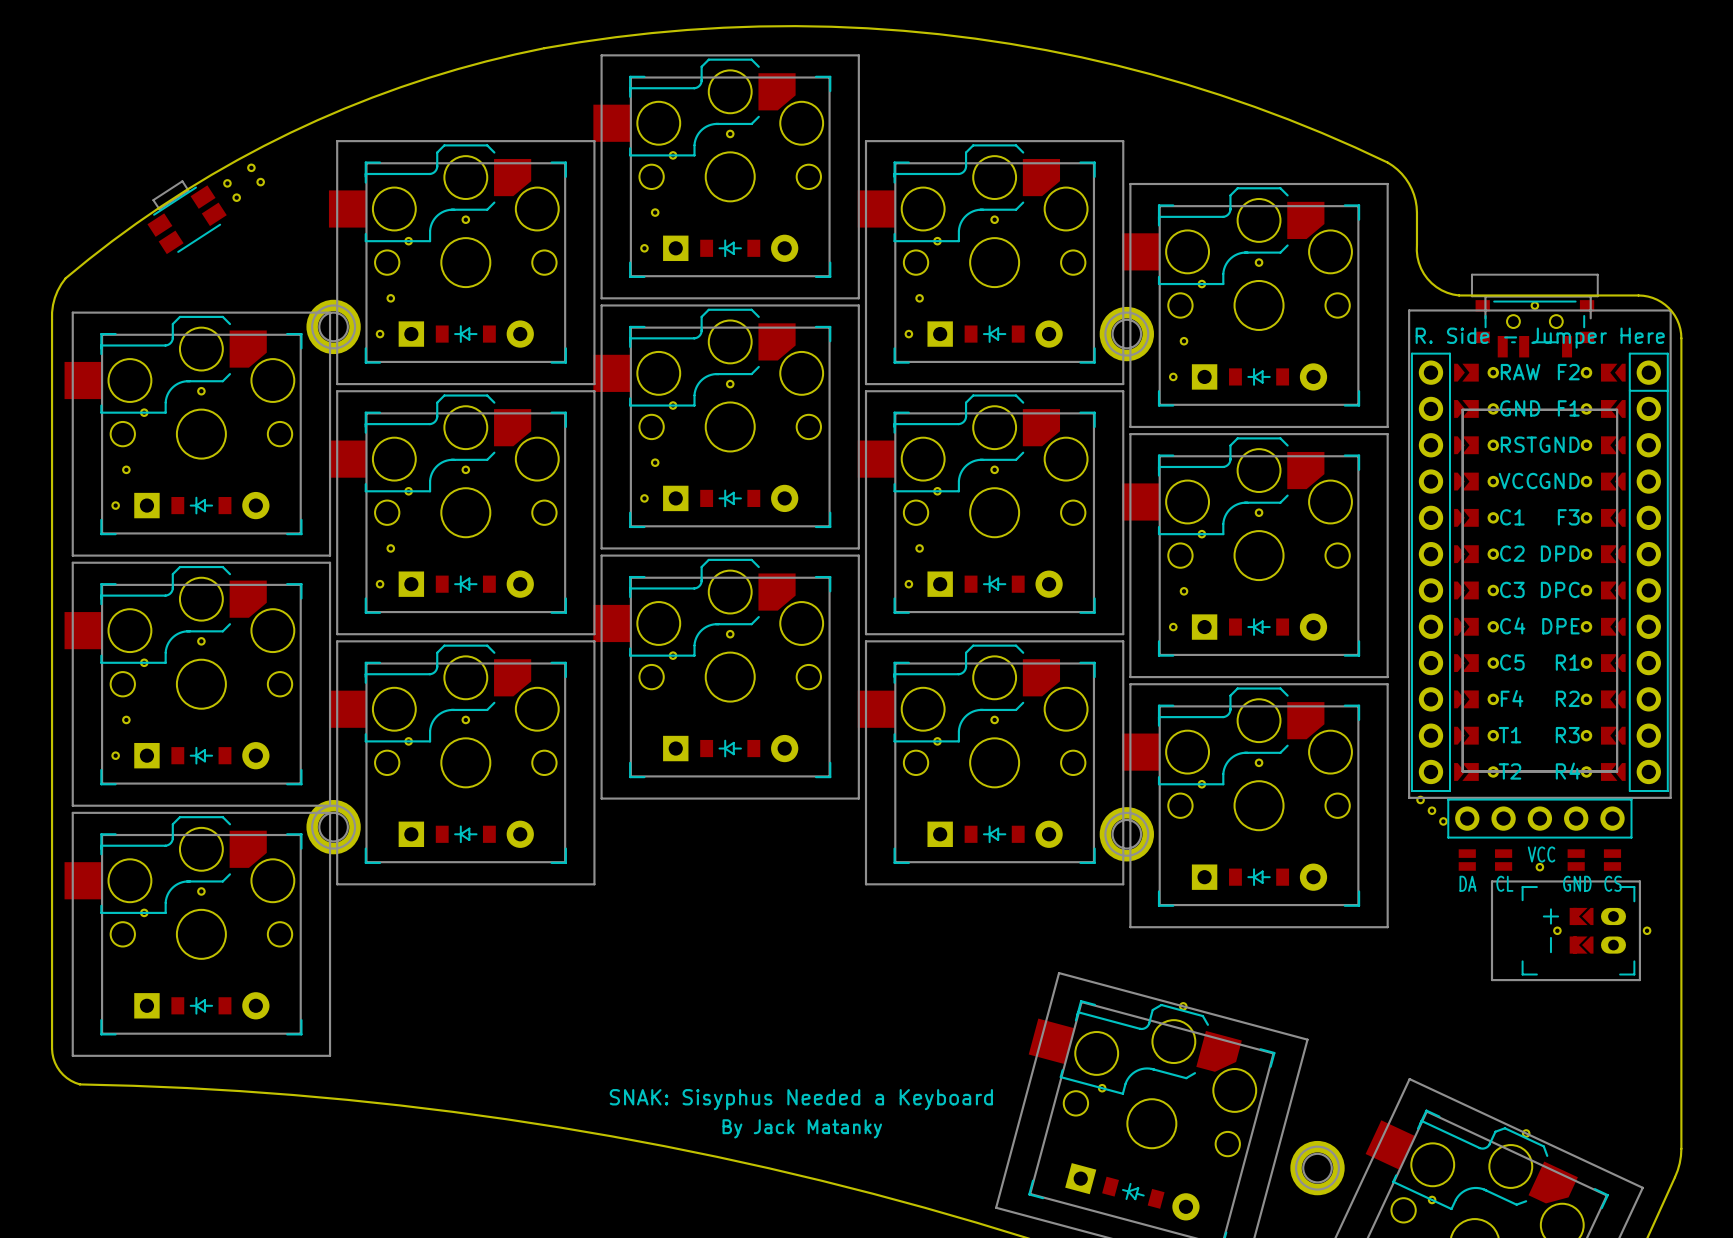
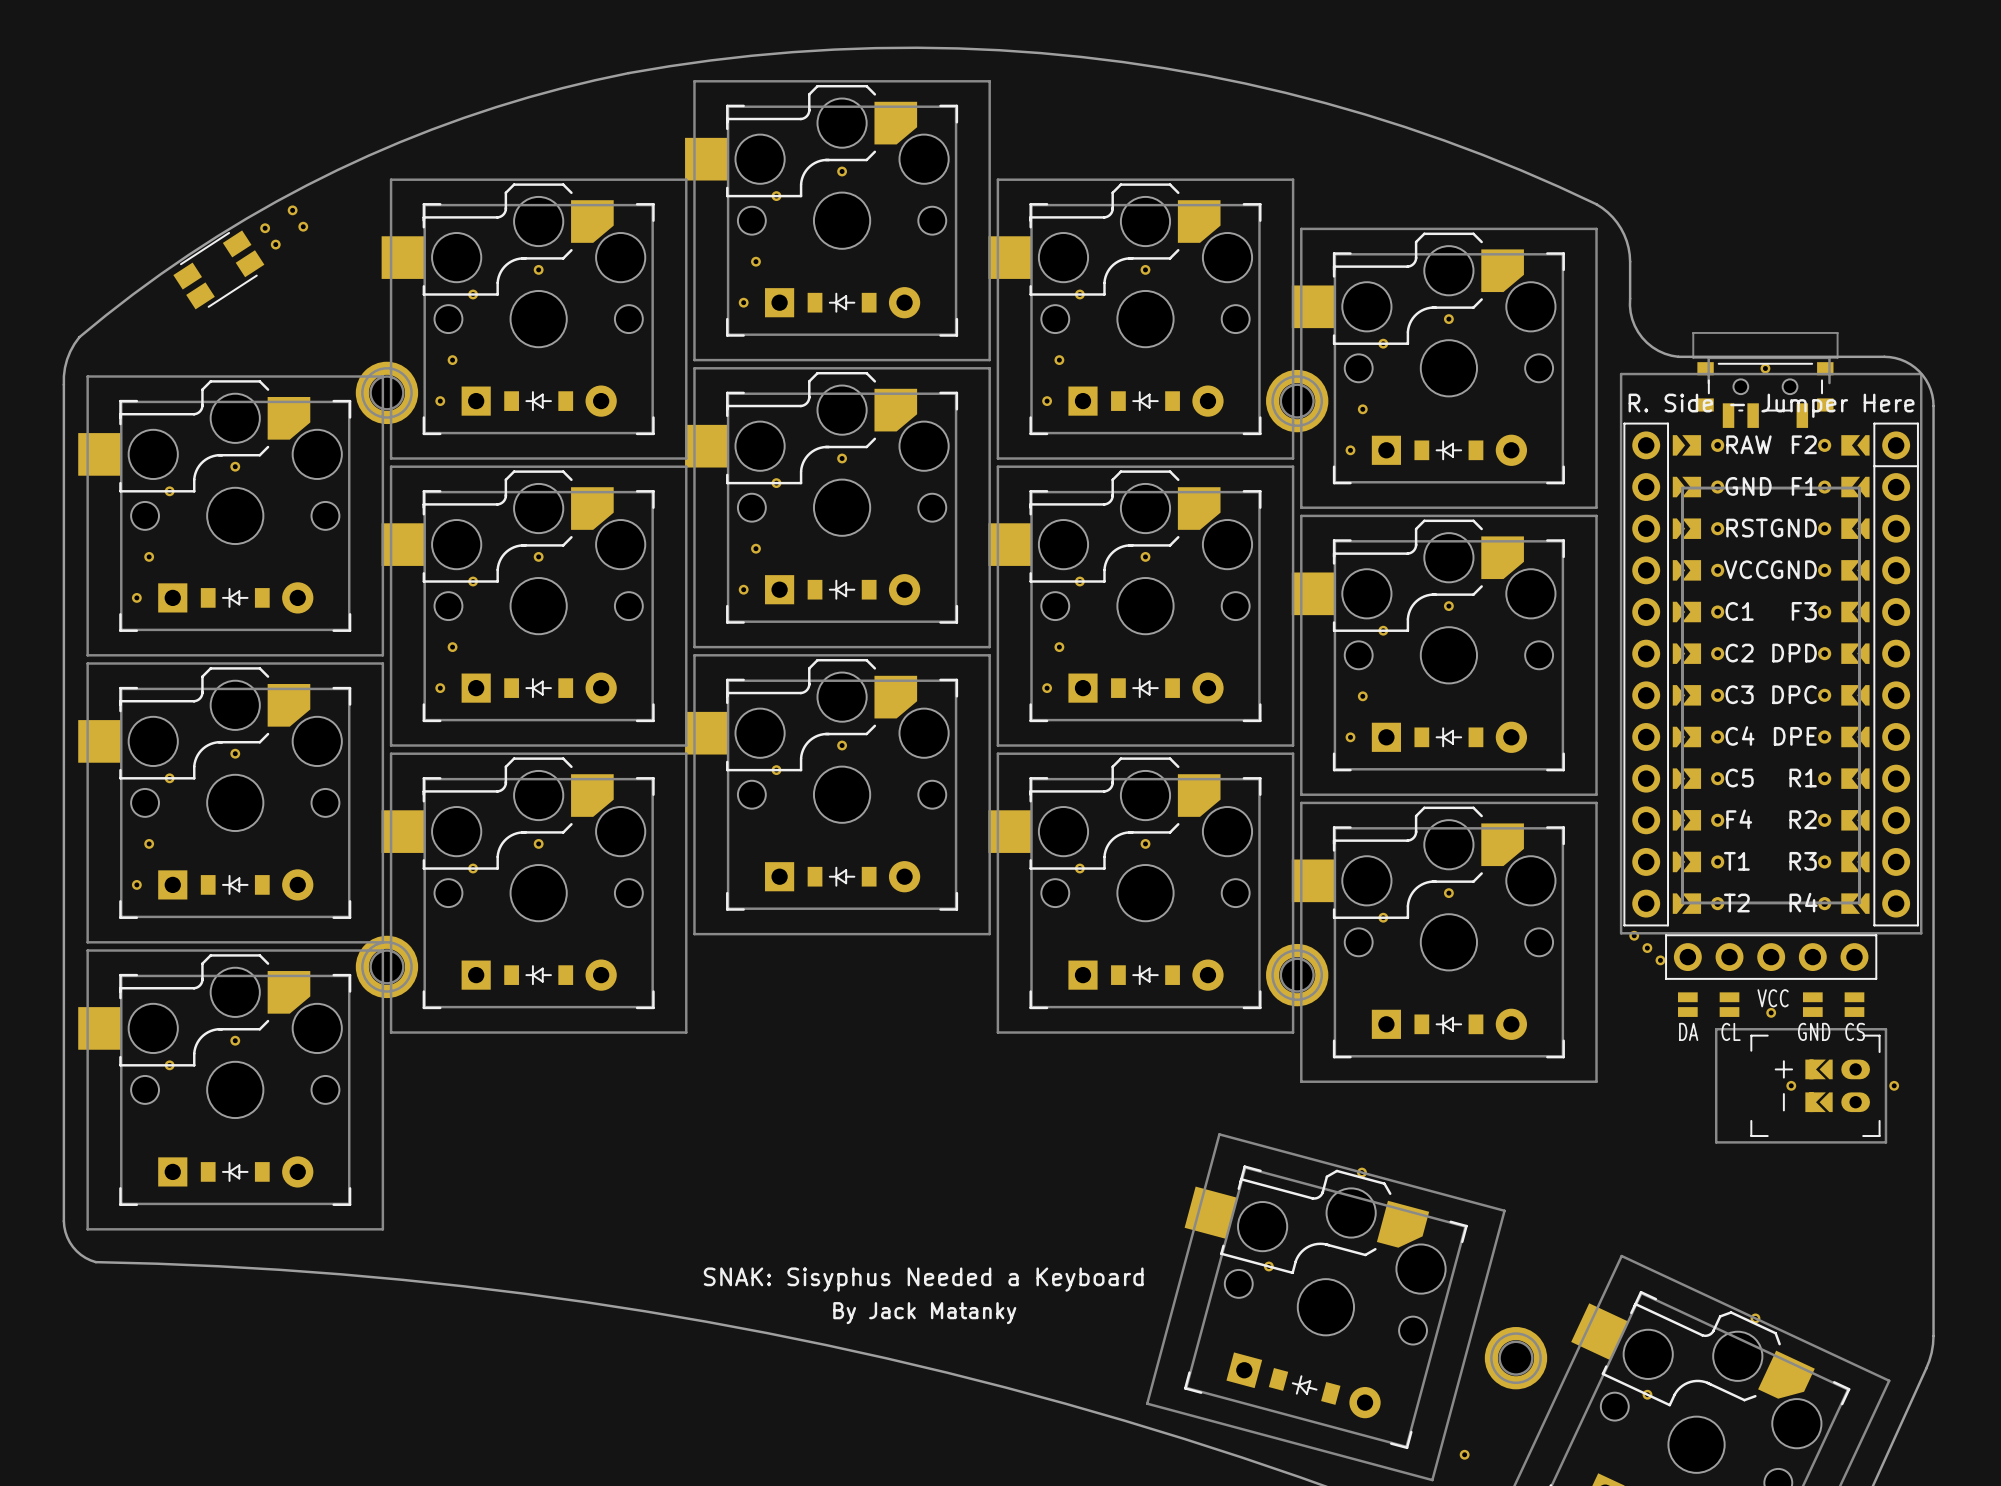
line: (182, 181) (153, 200) (159, 209) (188, 190) (182, 181) -> none

